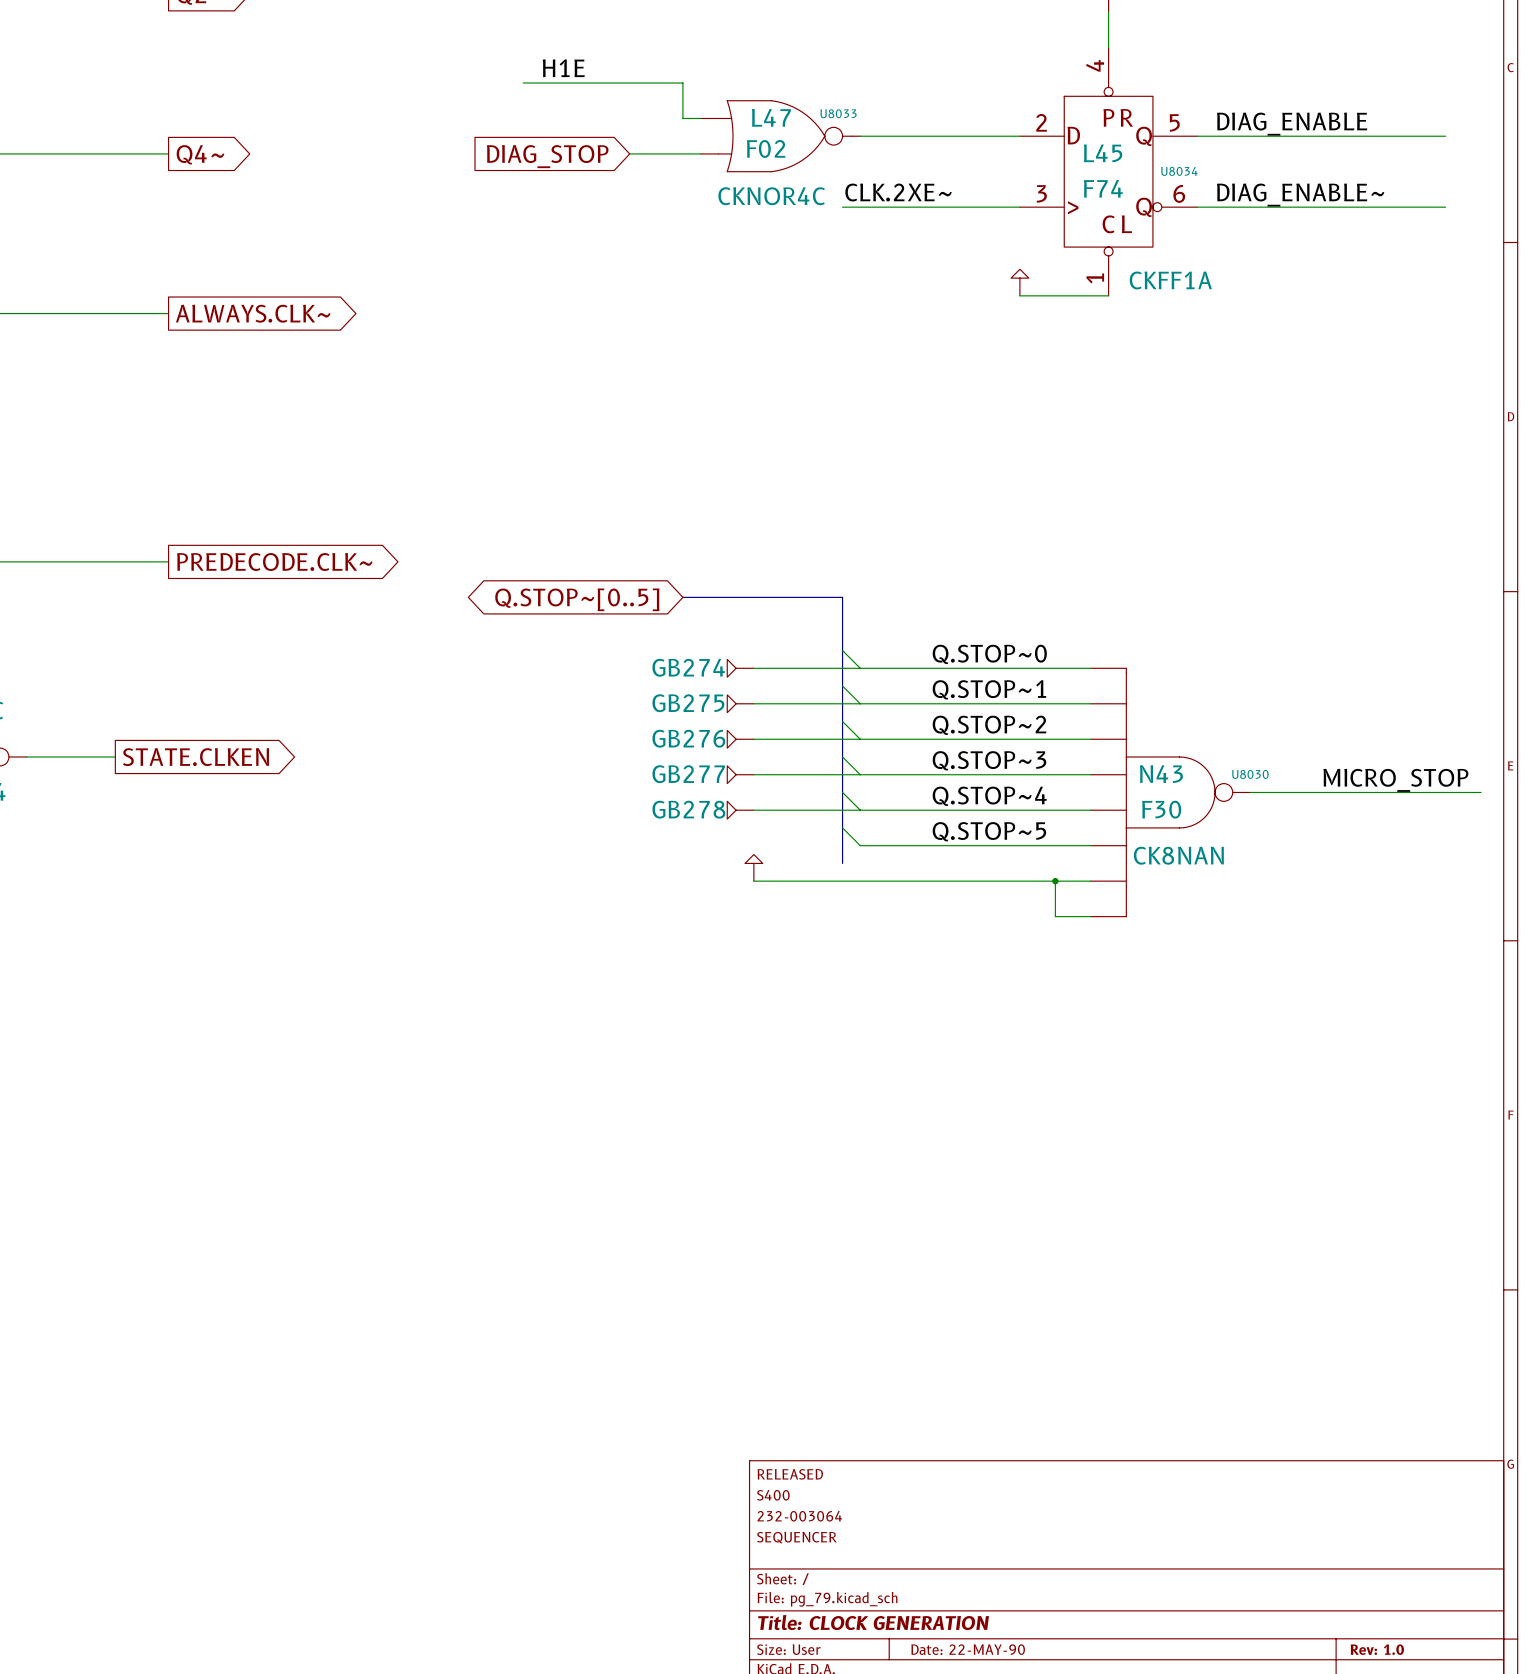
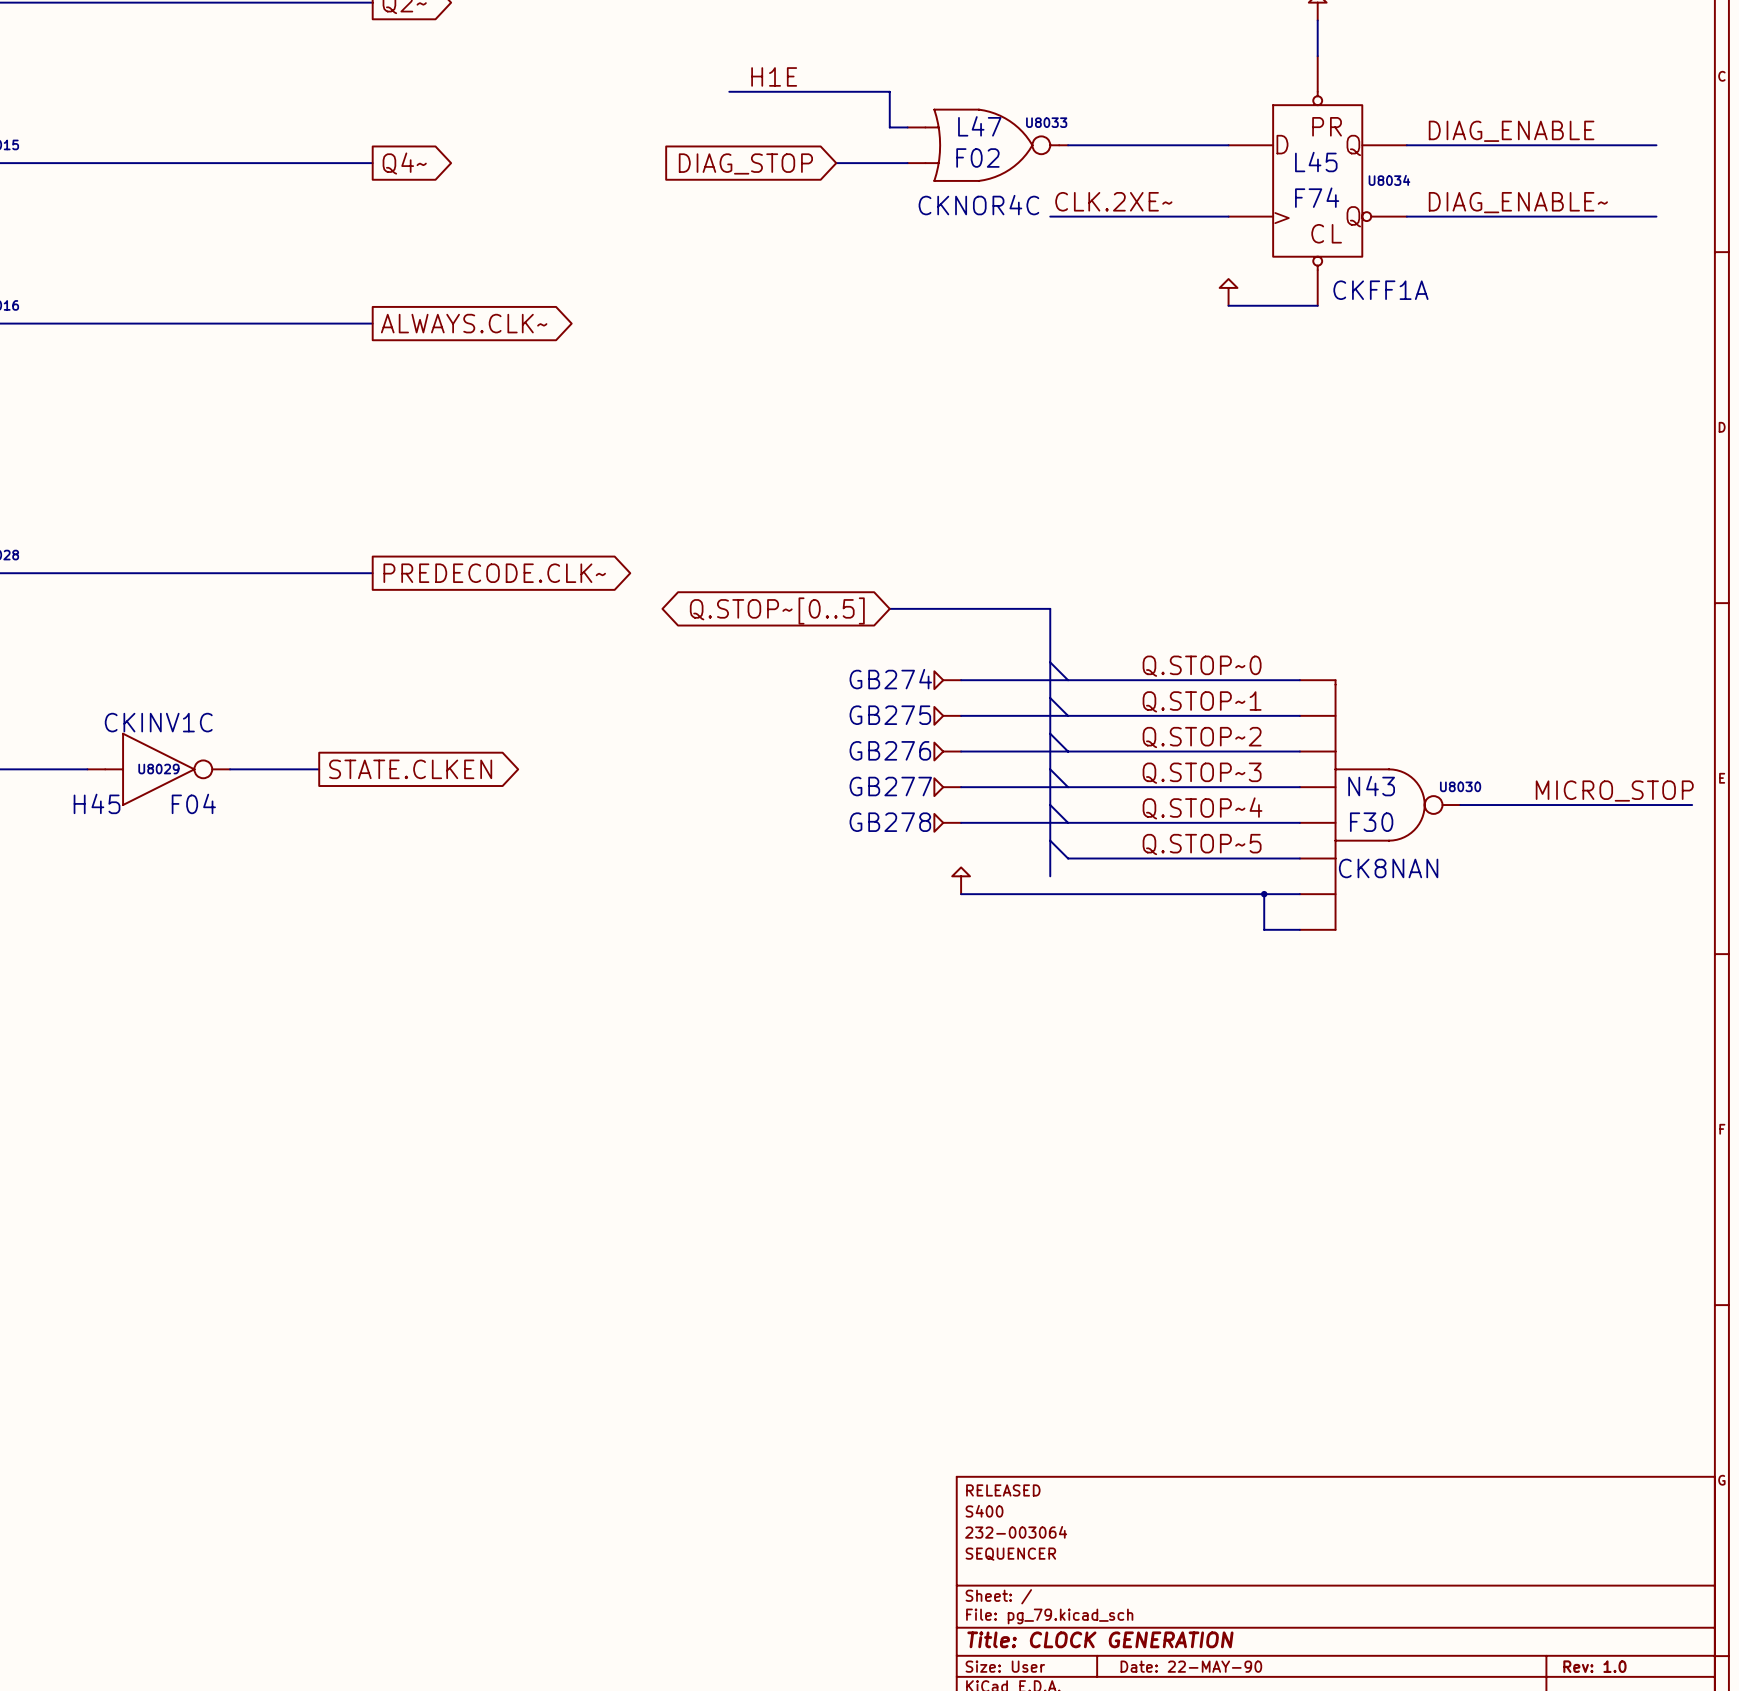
U8034 pin number: 4 (1095, 65) -> none
U8034 pin number: 2 (1041, 122) -> none
U8034 pin number: 5 (1174, 122) -> none
U8034 pin number: 3 (1041, 193) -> none
U8034 pin number: 6 (1179, 193) -> none
U8034 pin number: 1 (1095, 278) -> none

